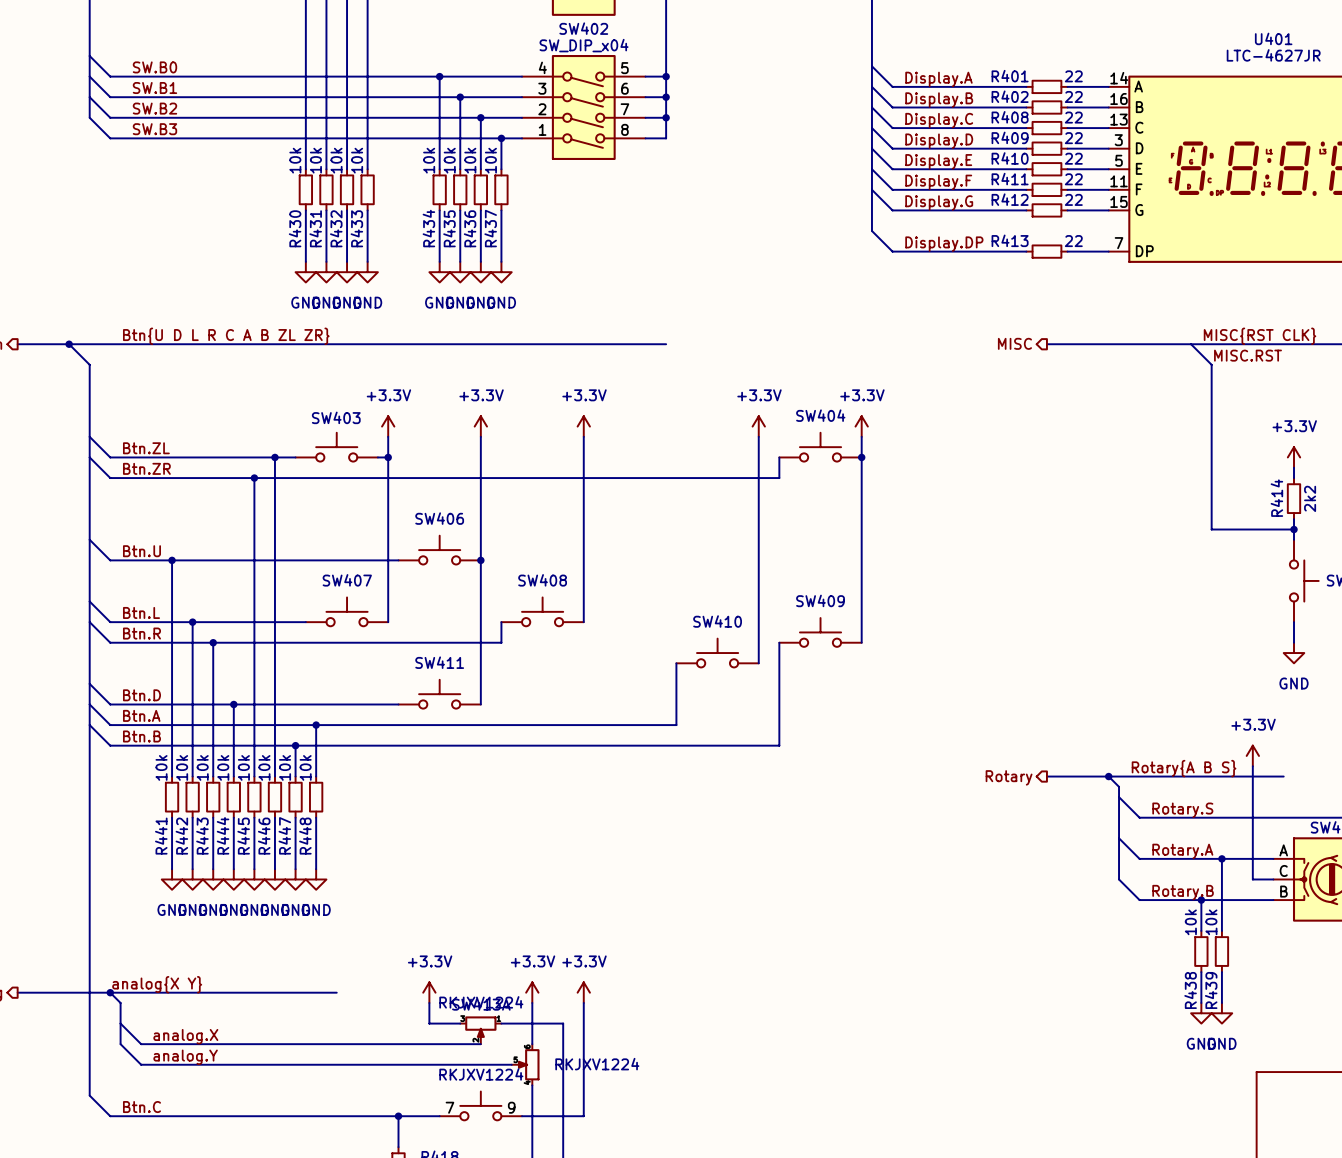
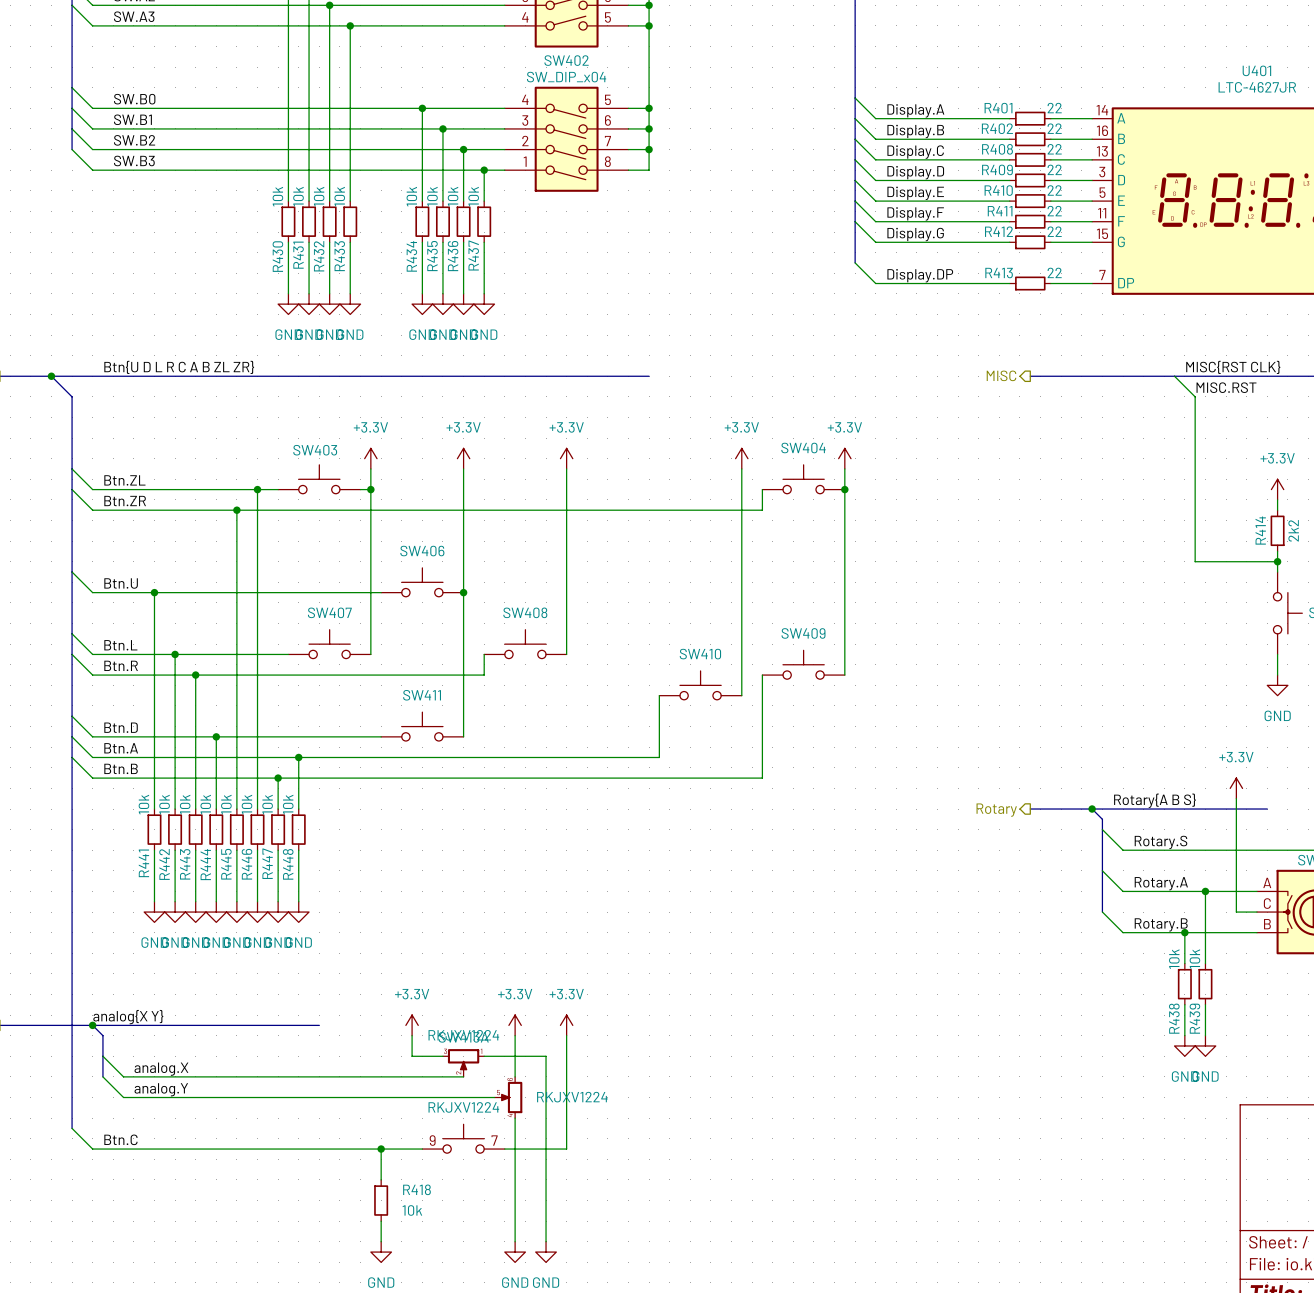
part flip: as is (480, 1105) -> left-right (463, 1138)

